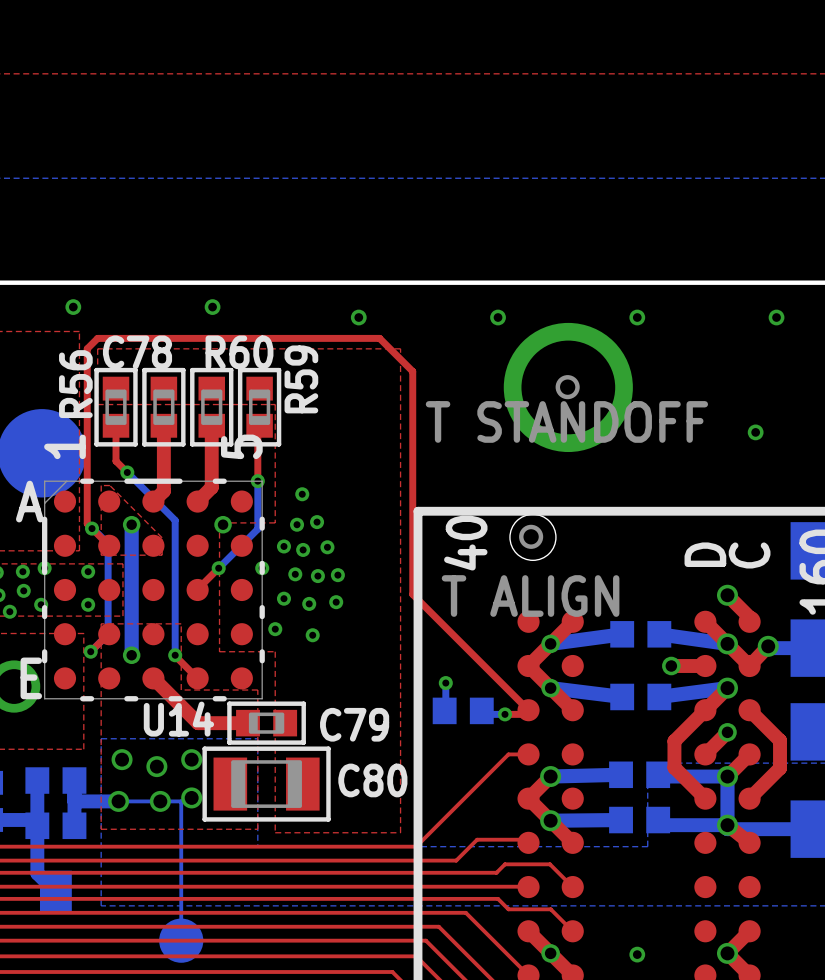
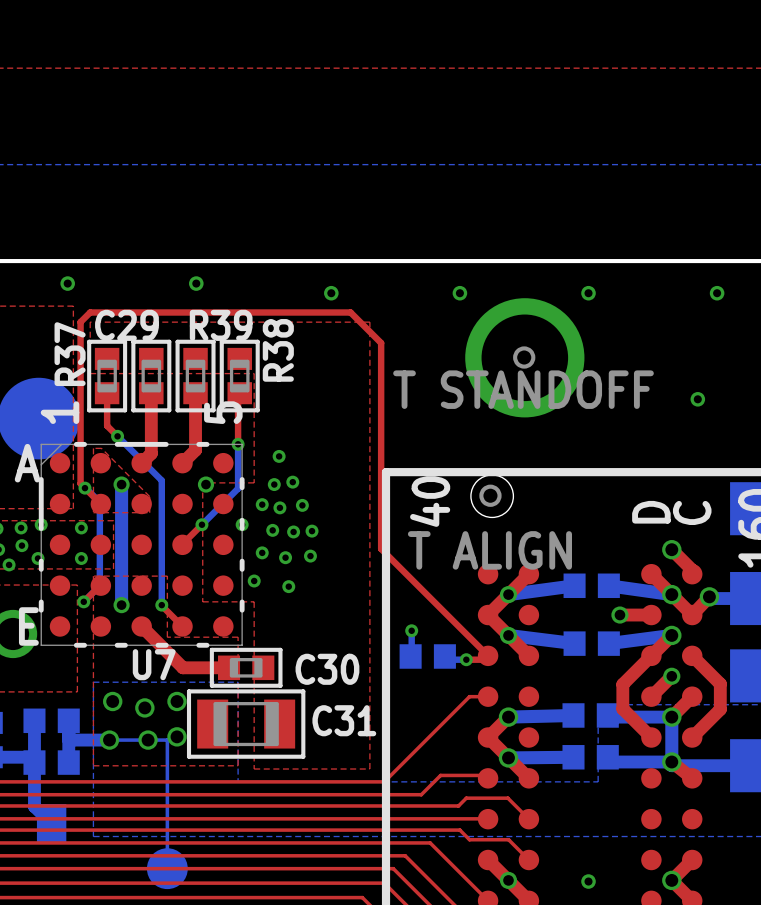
C78 name: C78 (137, 352) -> C29 (126, 325)
R60 name: R60 (239, 352) -> R39 (221, 325)
R59 name: R59 (301, 379) -> R38 (278, 350)
R56 name: R56 (75, 384) -> R37 (70, 354)
U14 name: U14 (178, 719) -> U7 (154, 664)
C79 name: C79 (354, 724) -> C30 (327, 669)
C80 name: C80 (372, 780) -> C31 (344, 720)

